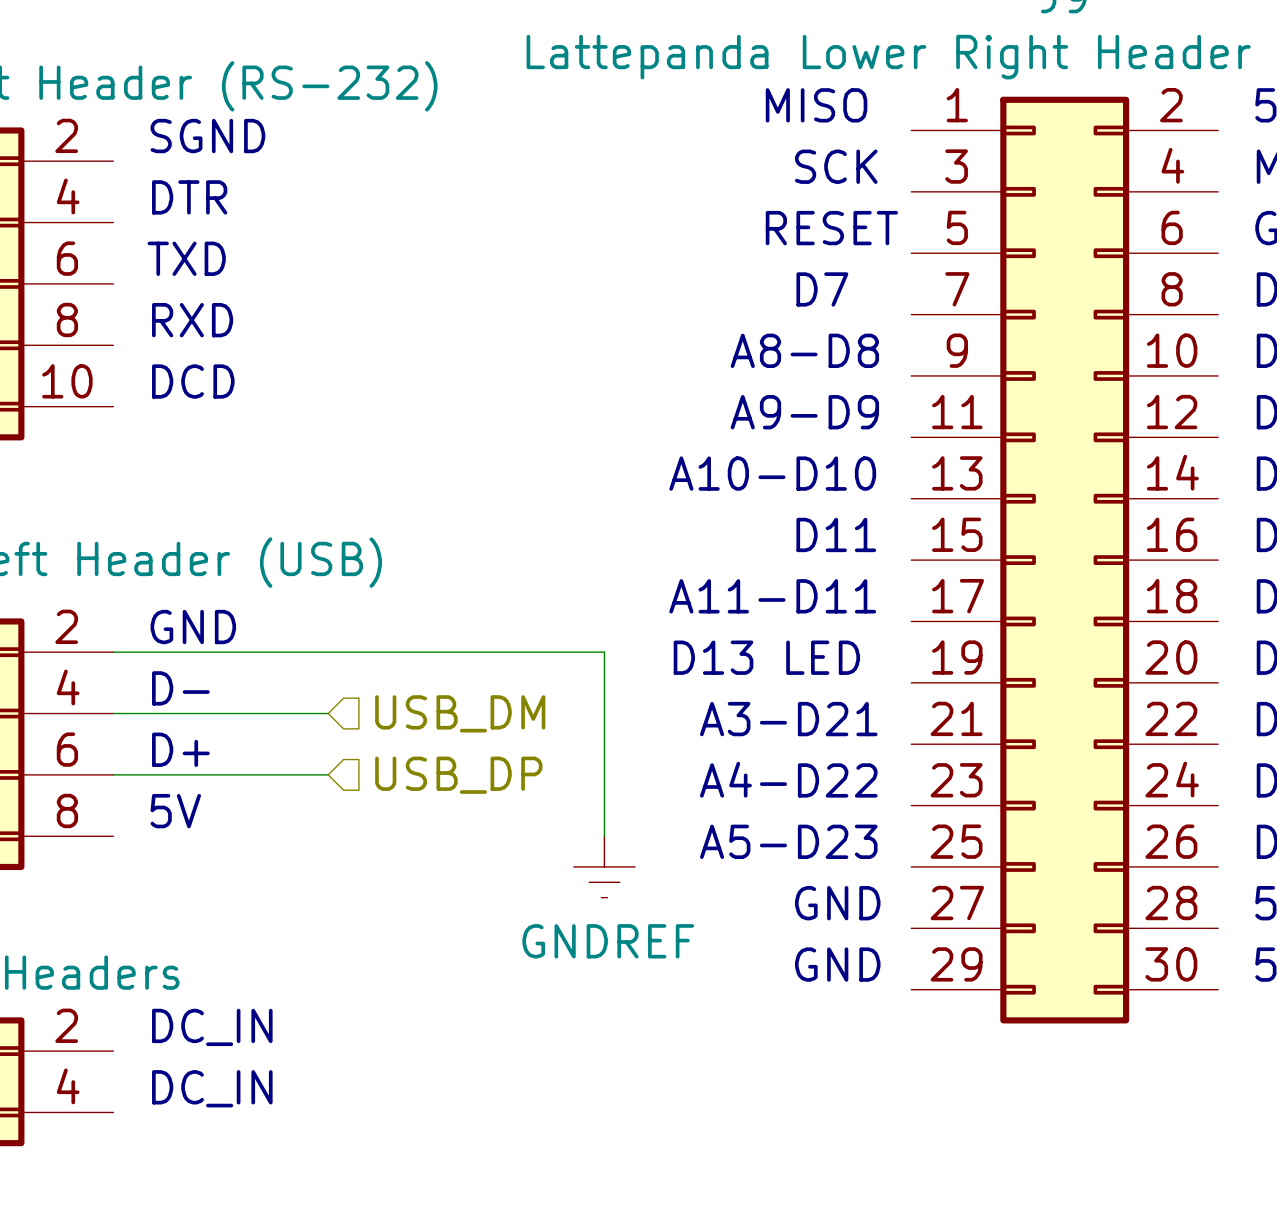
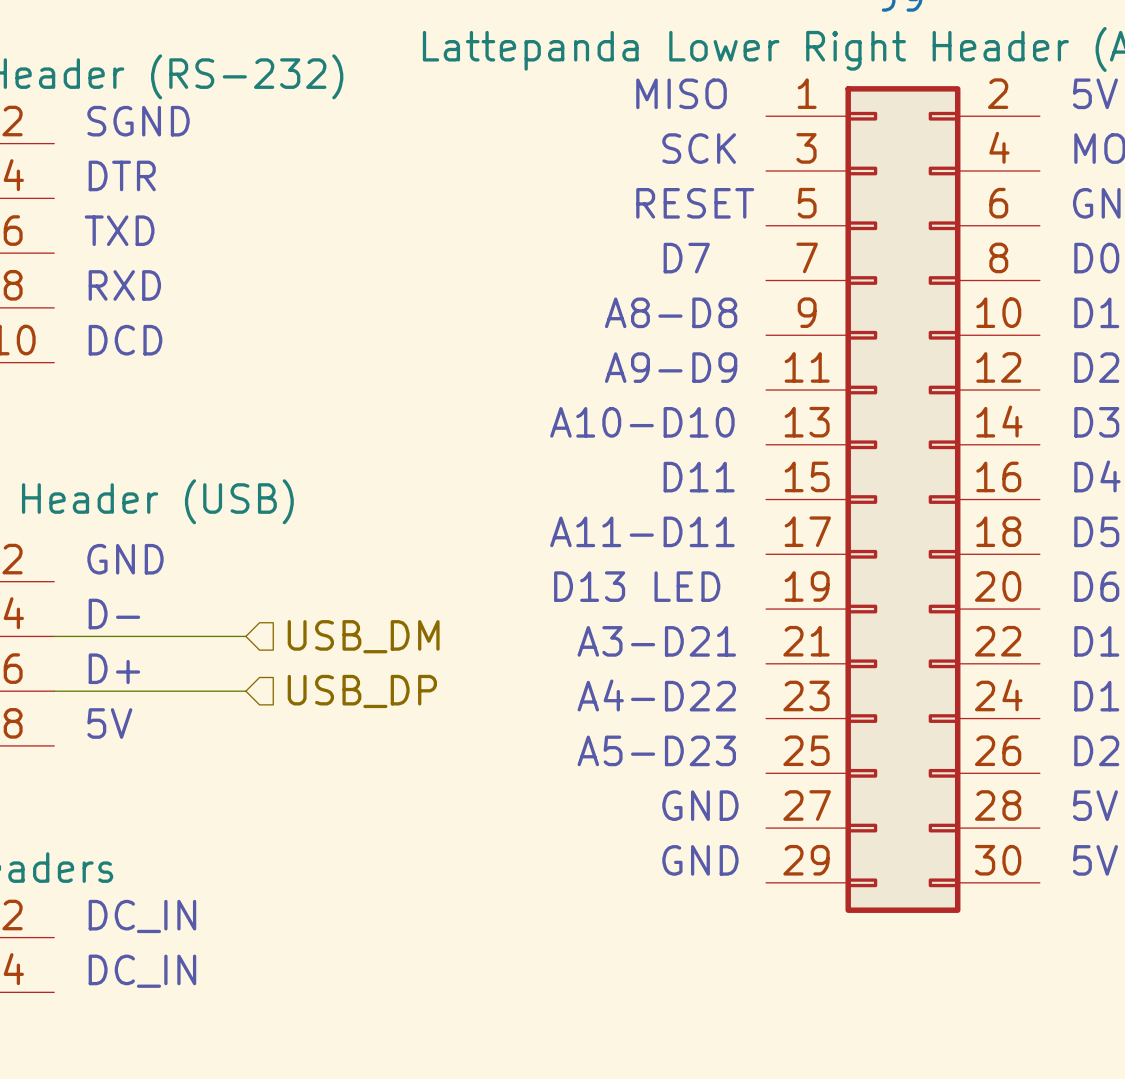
wire: (113, 652) (604, 652) (604, 836) -> none
power symbol: GNDREF (604, 866) -> none

